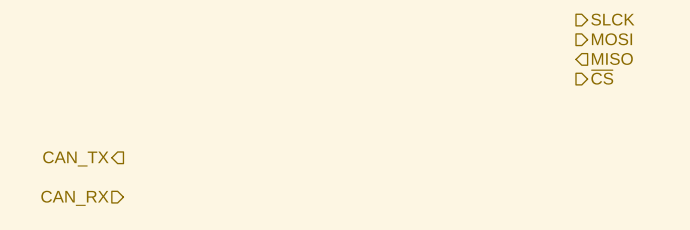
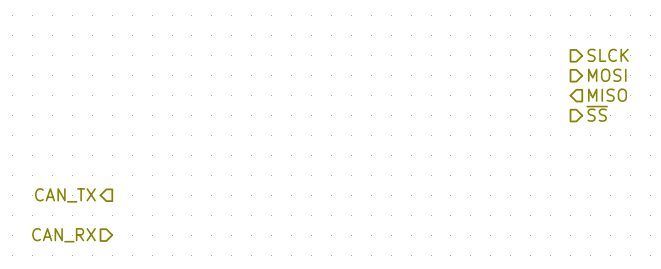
hierarchical label: ~{CS} (602, 77) -> ~{SS} (597, 113)

